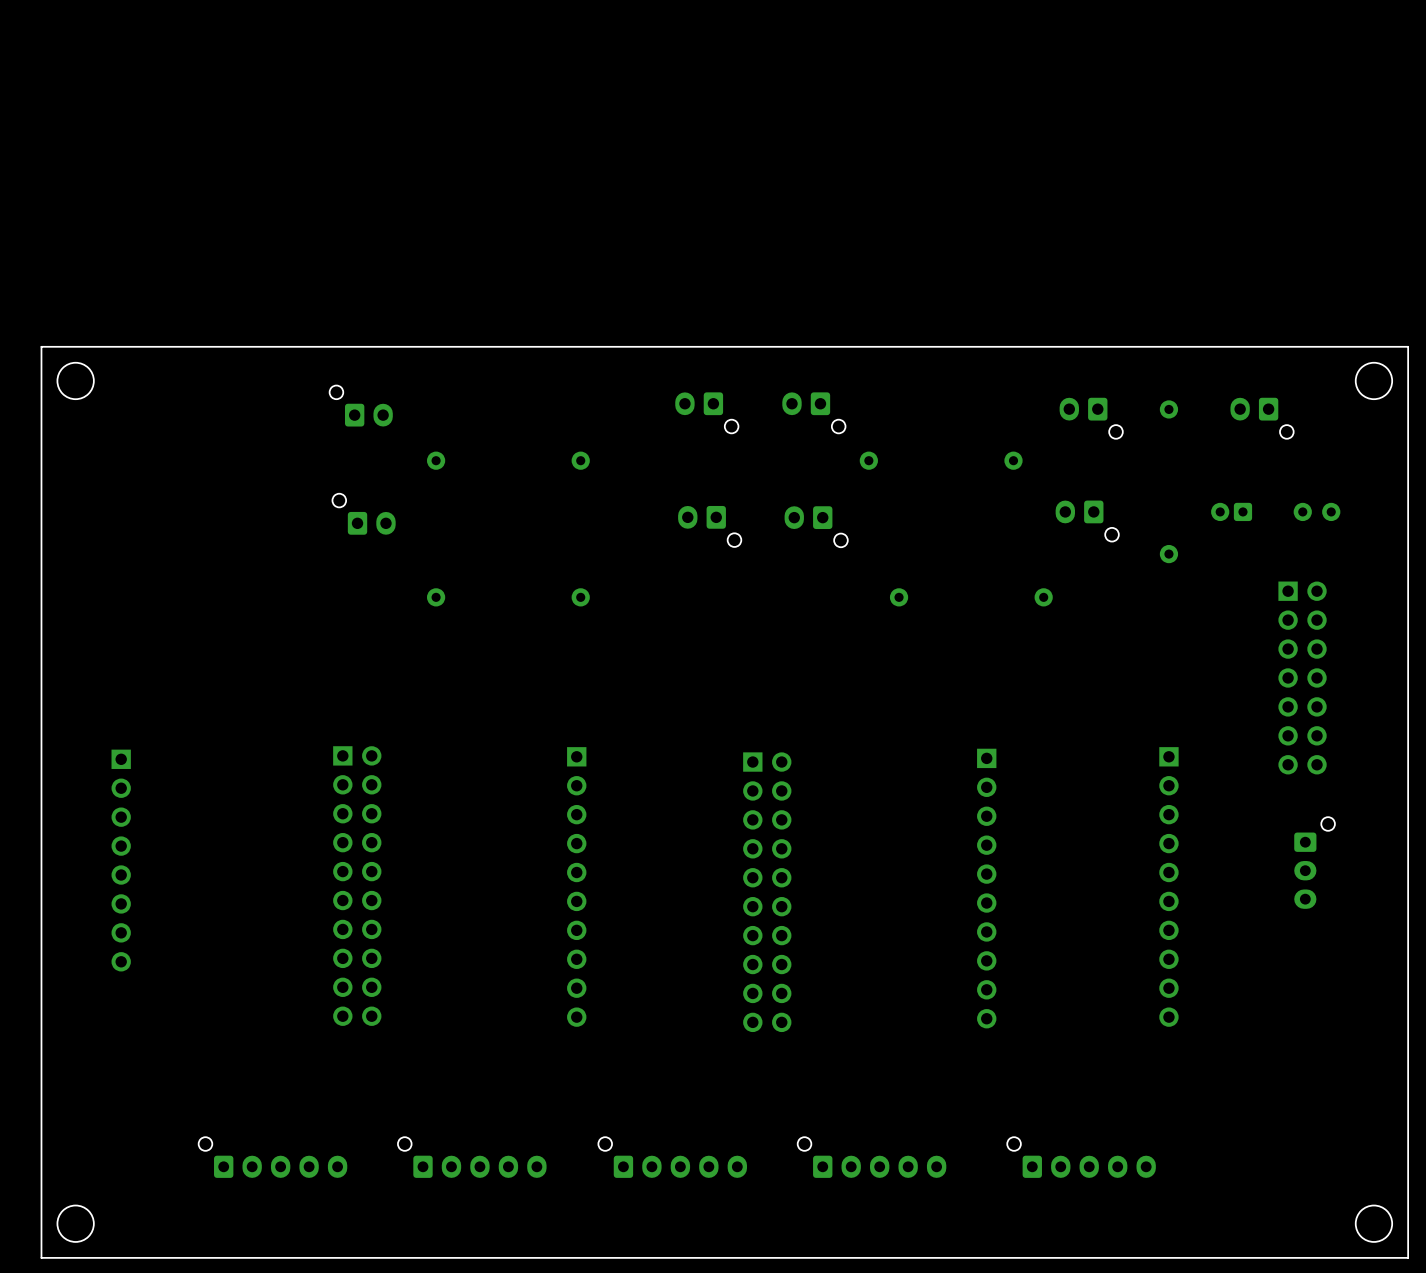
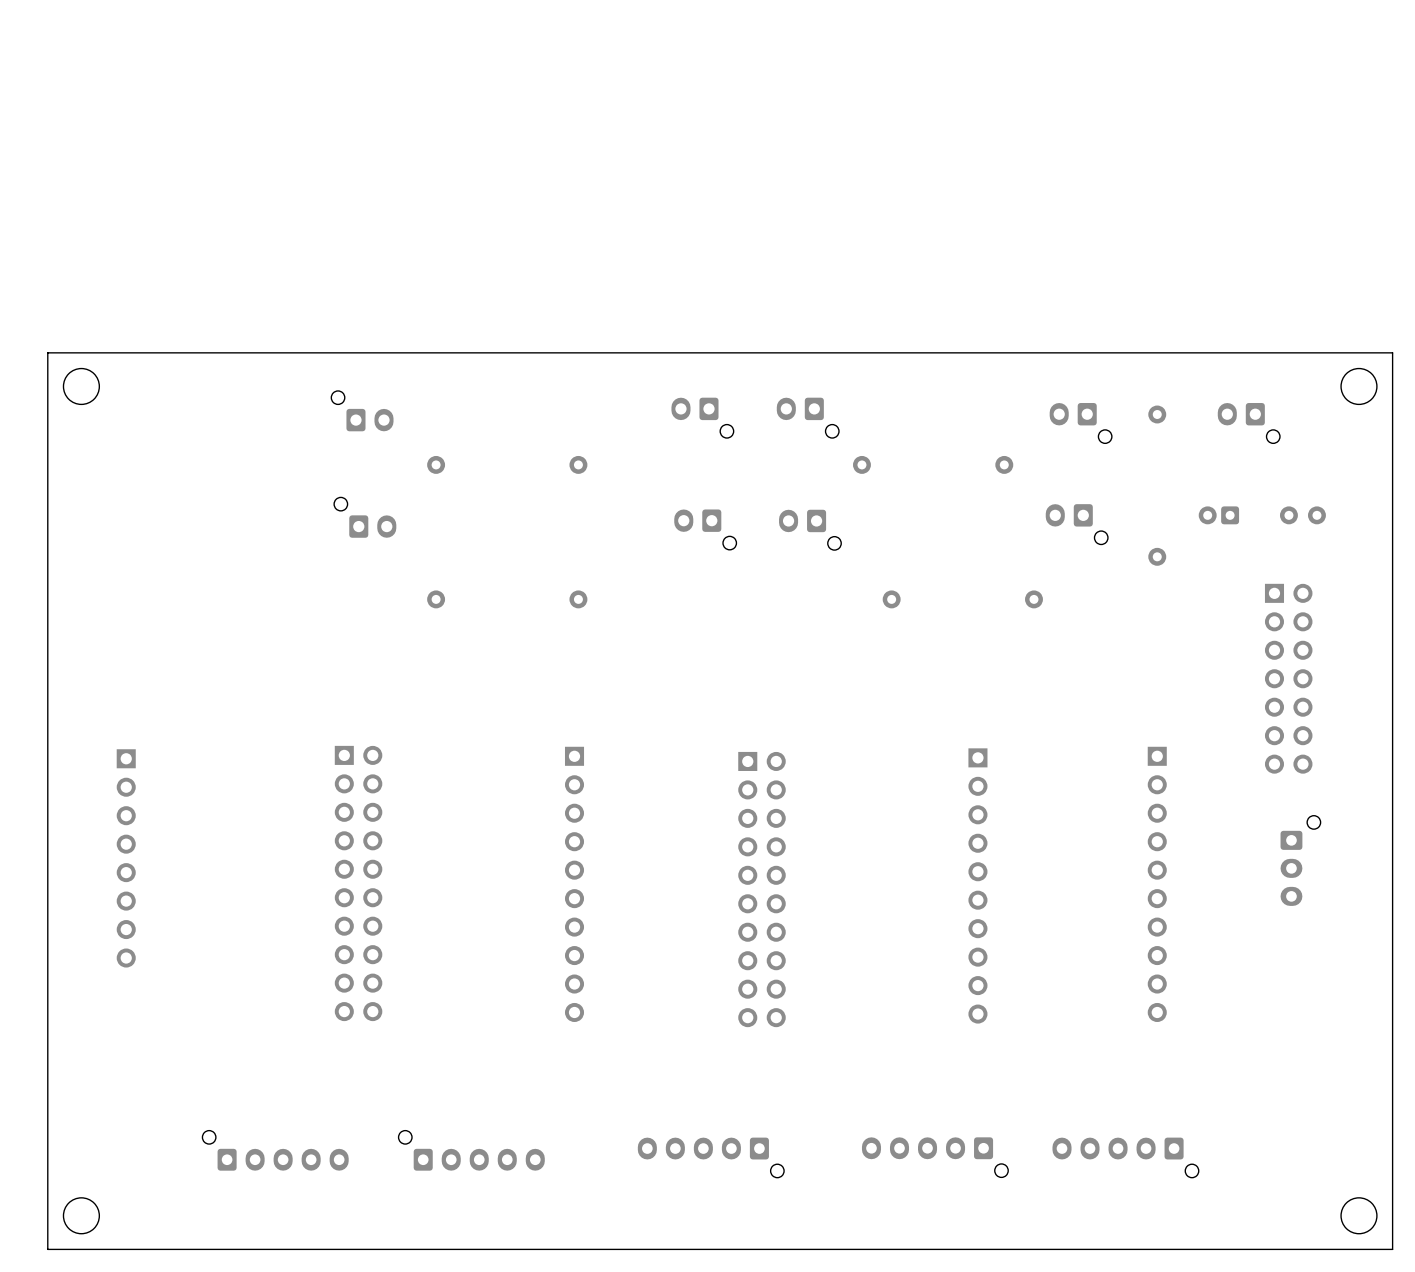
part rotation: 0° (672, 1157) -> 180° (710, 1157)
part: (871, 1157) -> none
part rotation: 0° (1081, 1157) -> 180° (1125, 1157)
part: none -> (935, 1157)

